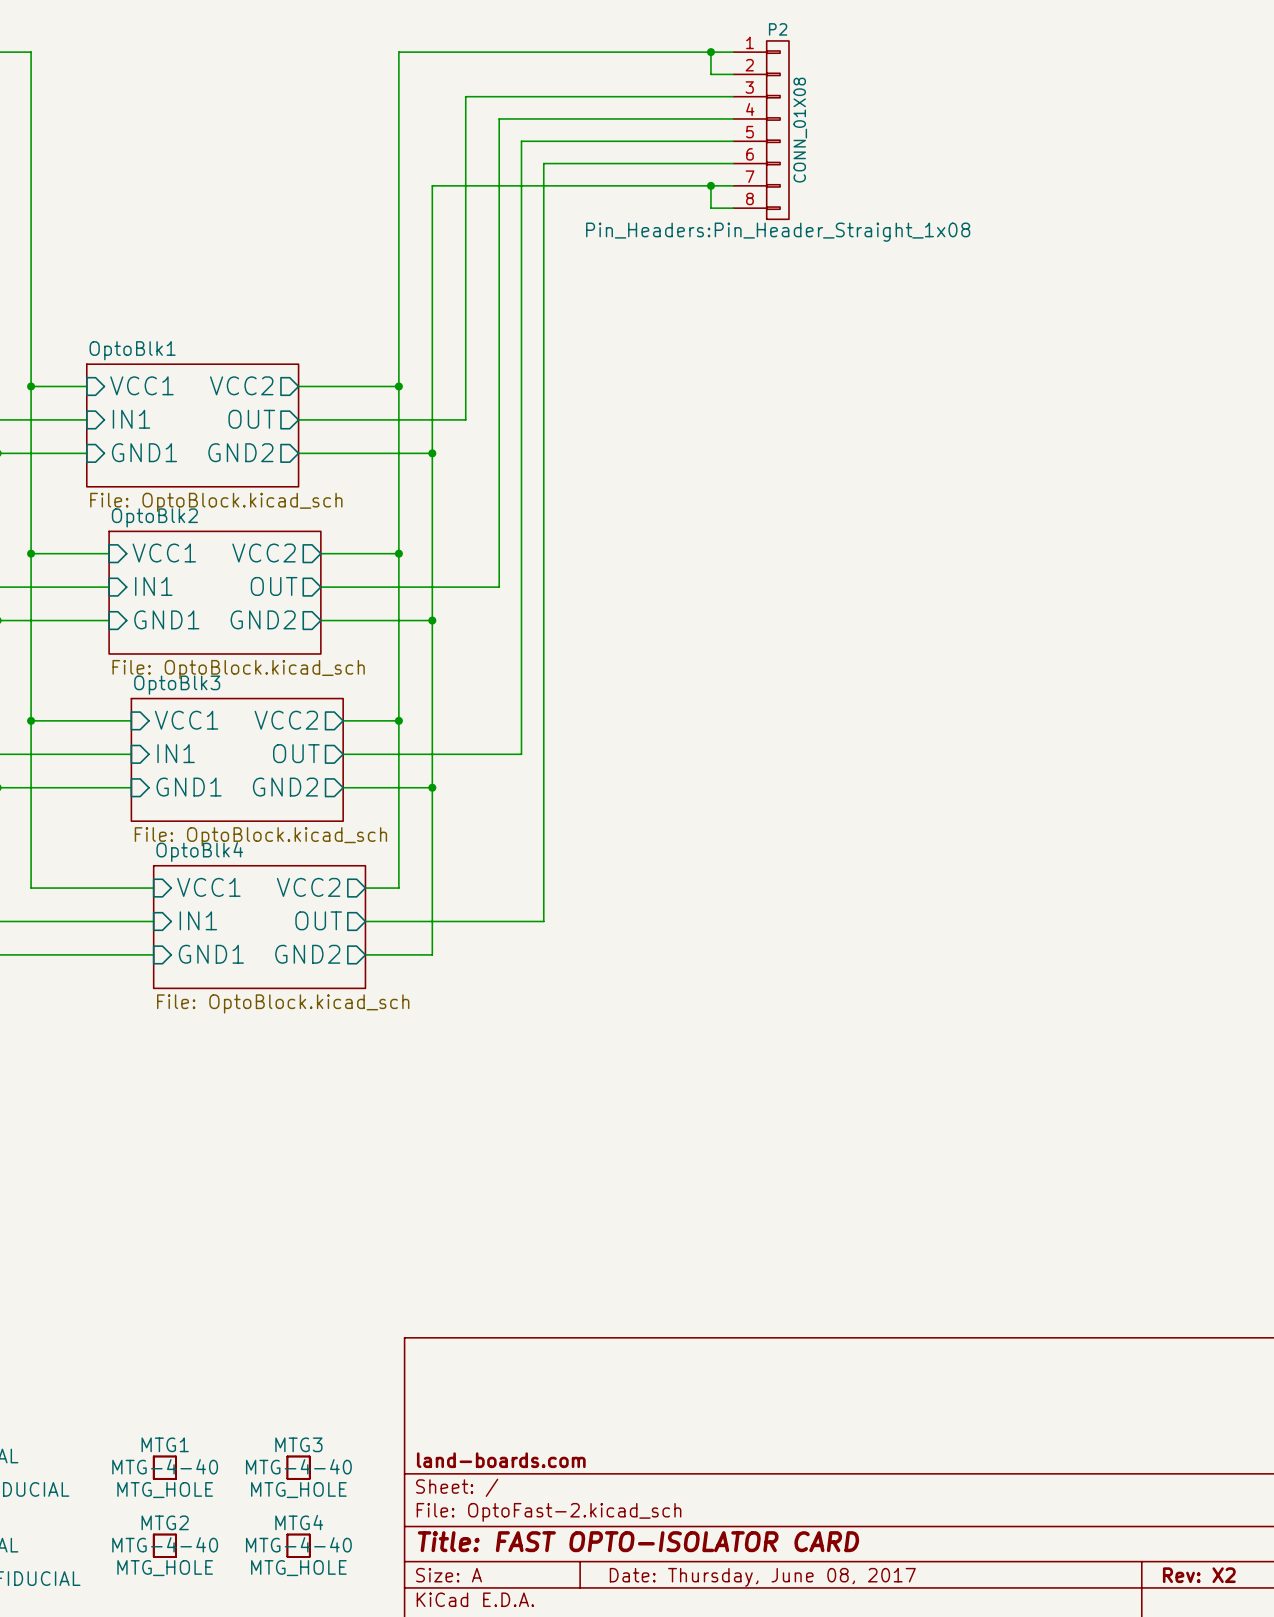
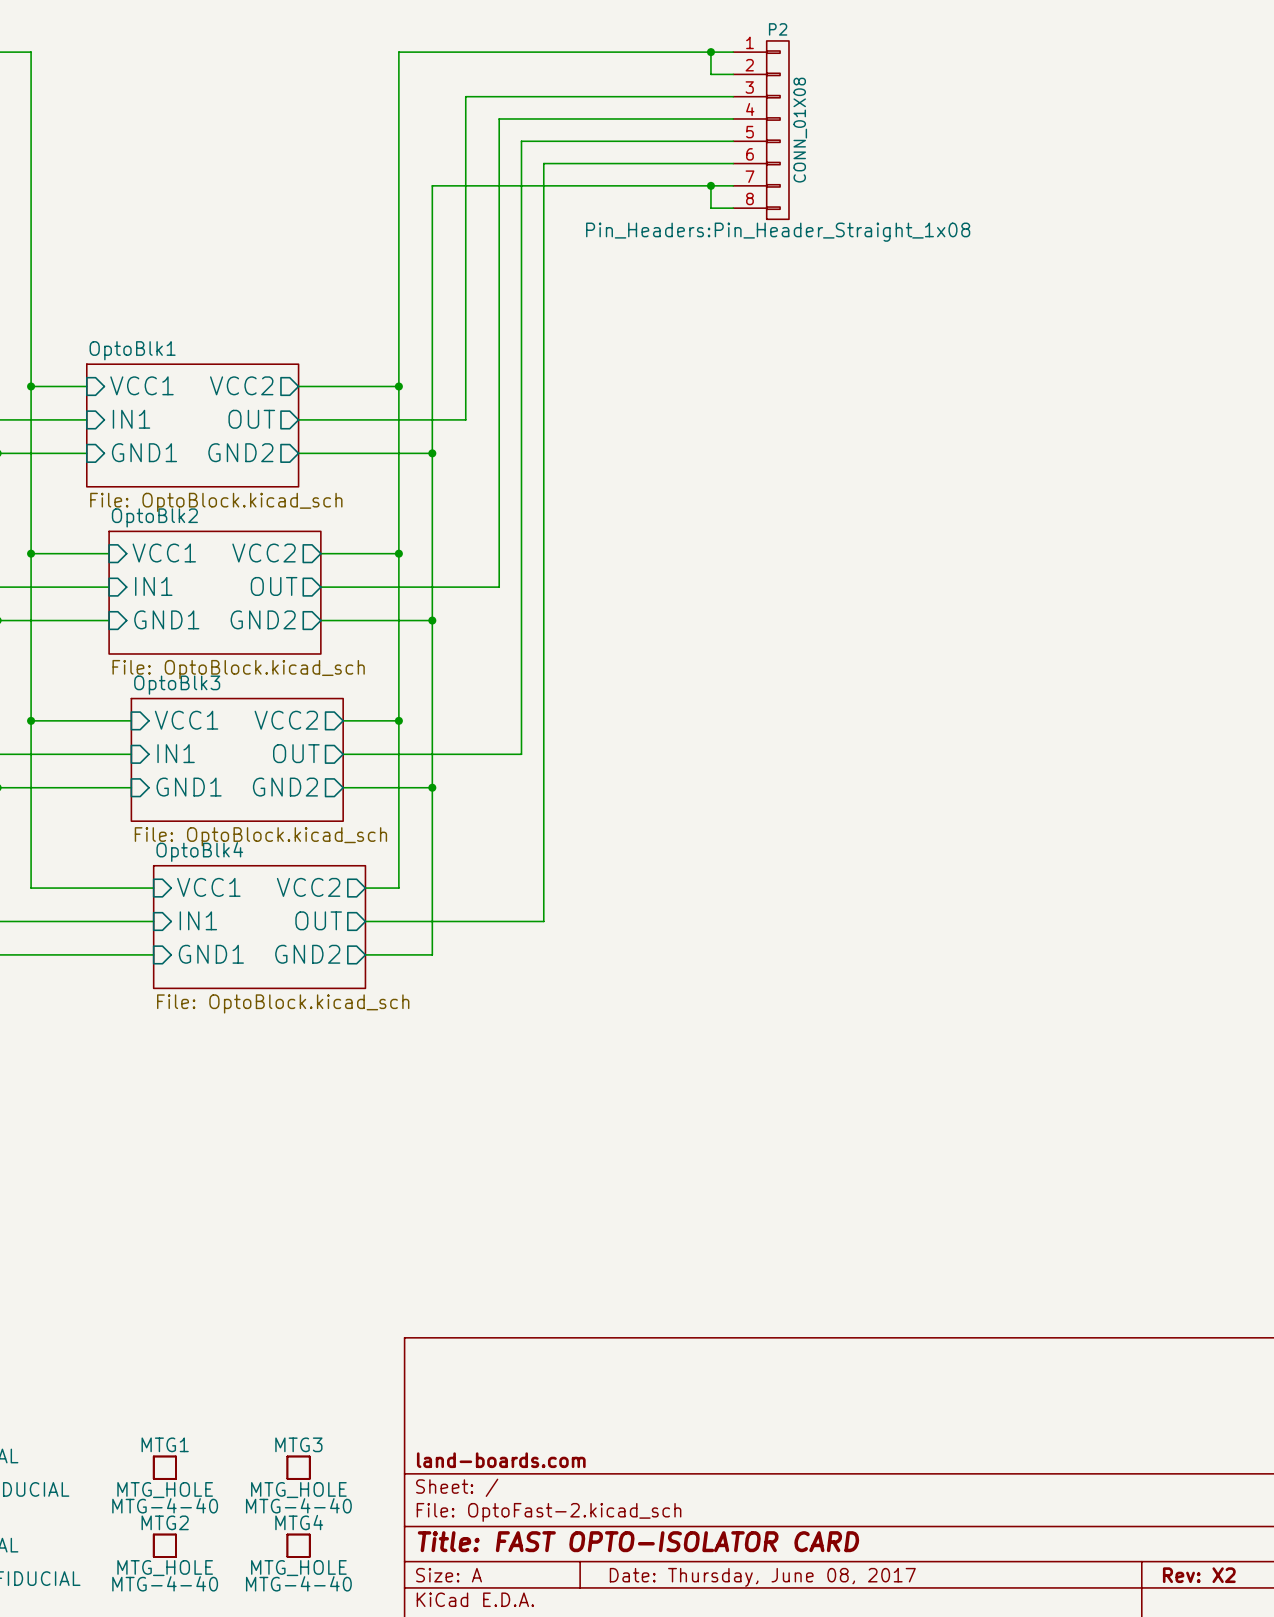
MTG1 text position: MTG-4-40 (165, 1466) -> MTG-4-40 (165, 1505)
MTG3 text position: MTG-4-40 (298, 1466) -> MTG-4-40 (298, 1505)
MTG2 text position: MTG-4-40 (165, 1544) -> MTG-4-40 (165, 1583)
MTG4 text position: MTG-4-40 (298, 1544) -> MTG-4-40 (298, 1583)

